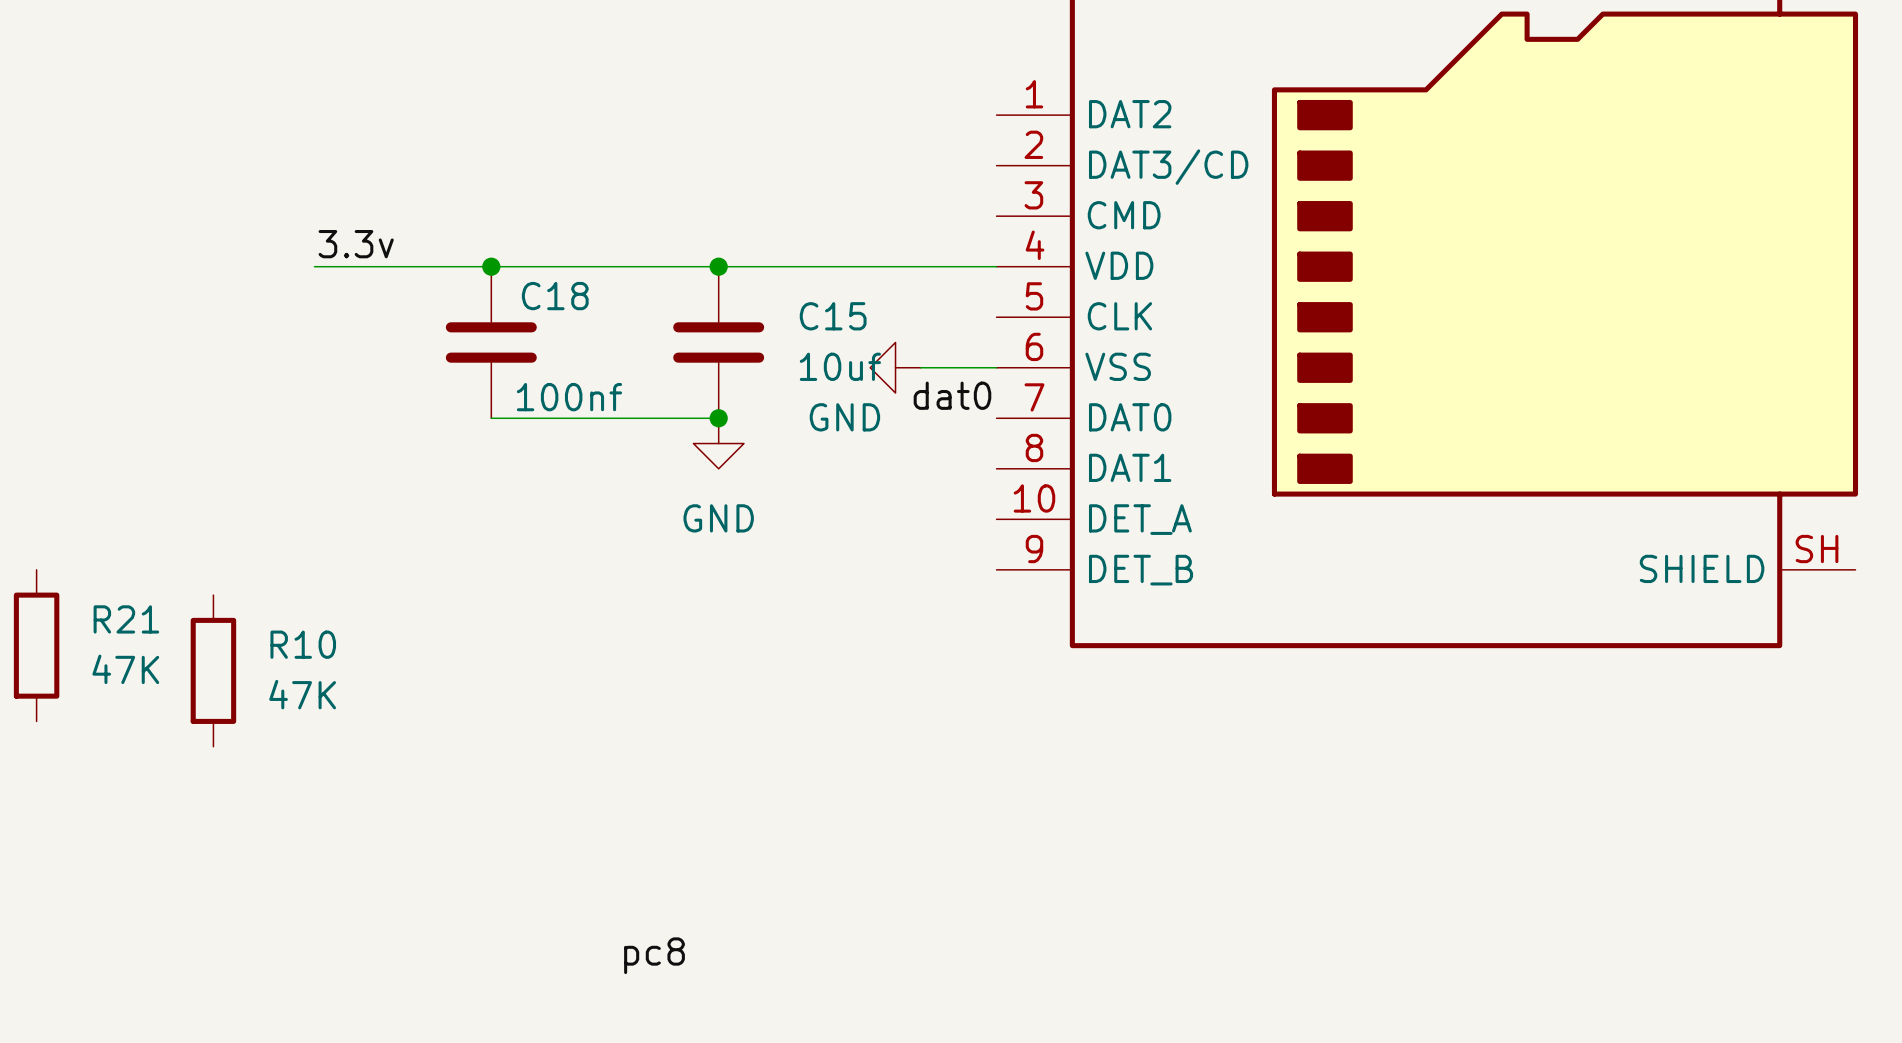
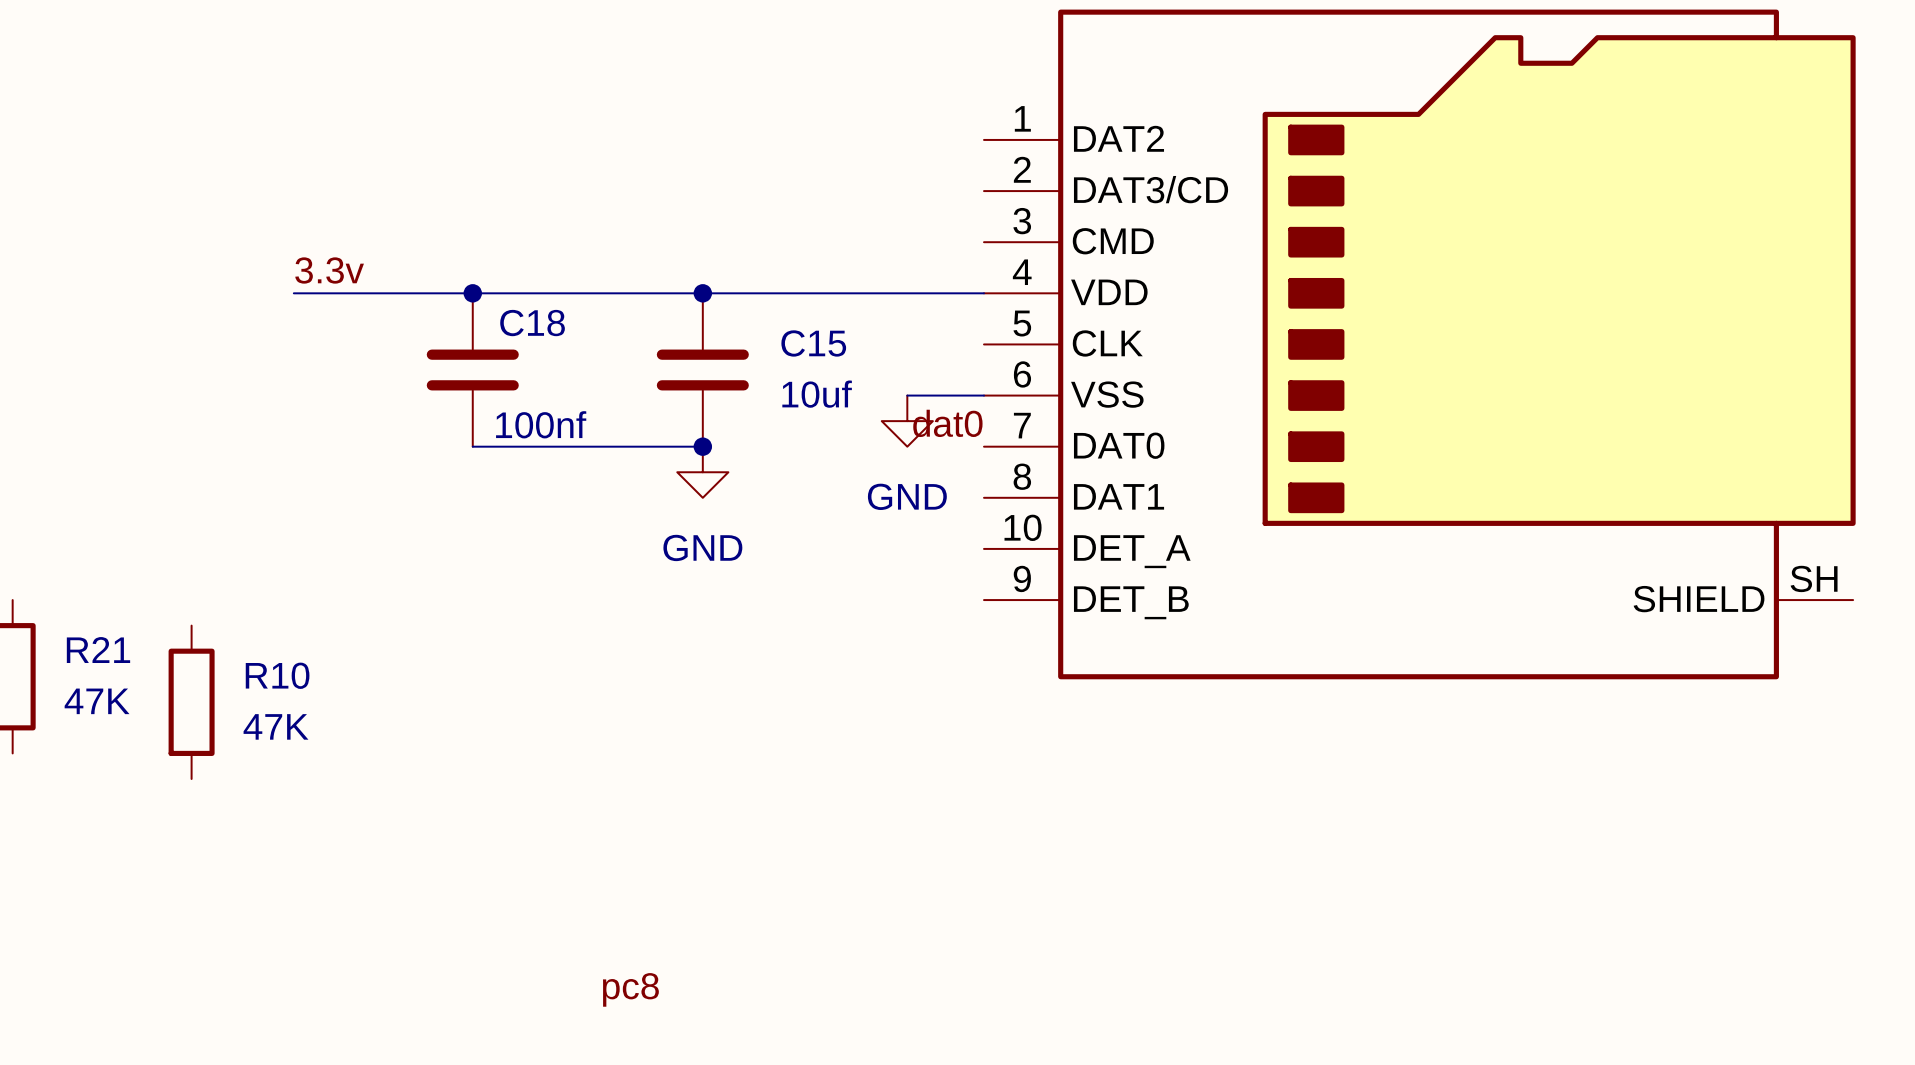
power symbol rotation: 0° (895, 367) -> 90° counterclockwise (907, 421)
power symbol position: GND (895, 367) -> GND (907, 421)
power symbol text position: GND (844, 417) -> GND (907, 496)

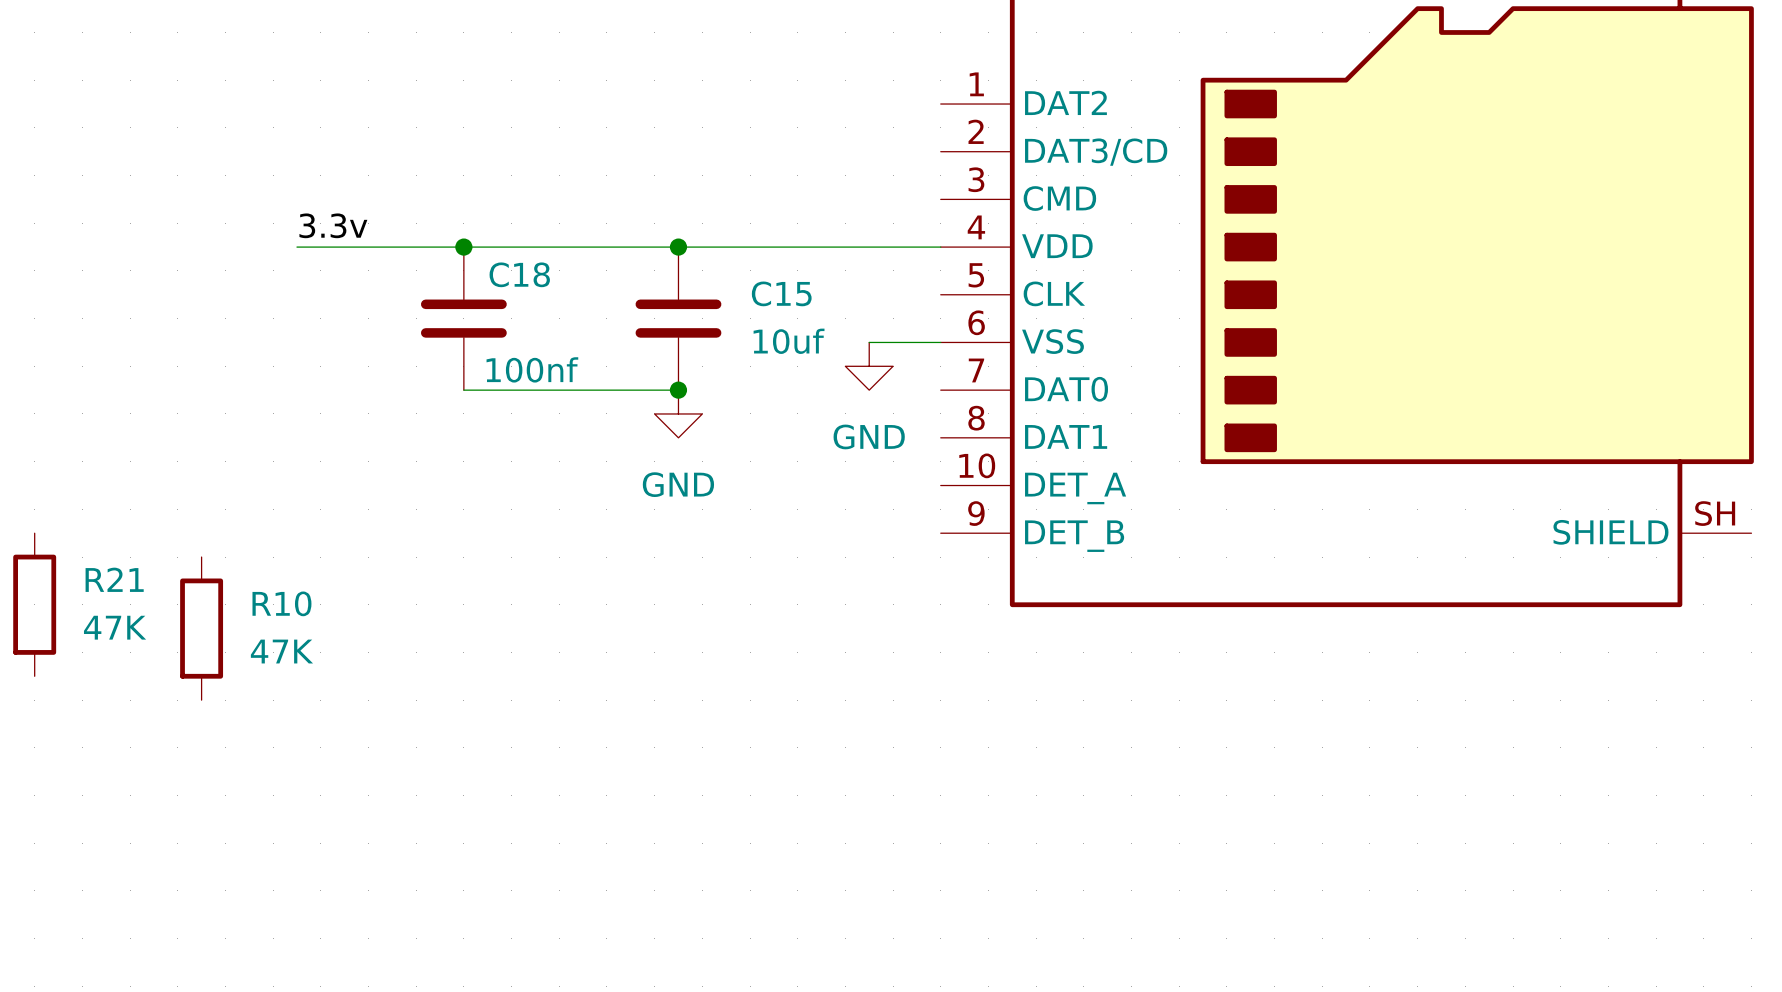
label: dat0 (947, 423) -> none
label: pc8 (630, 989) -> none

